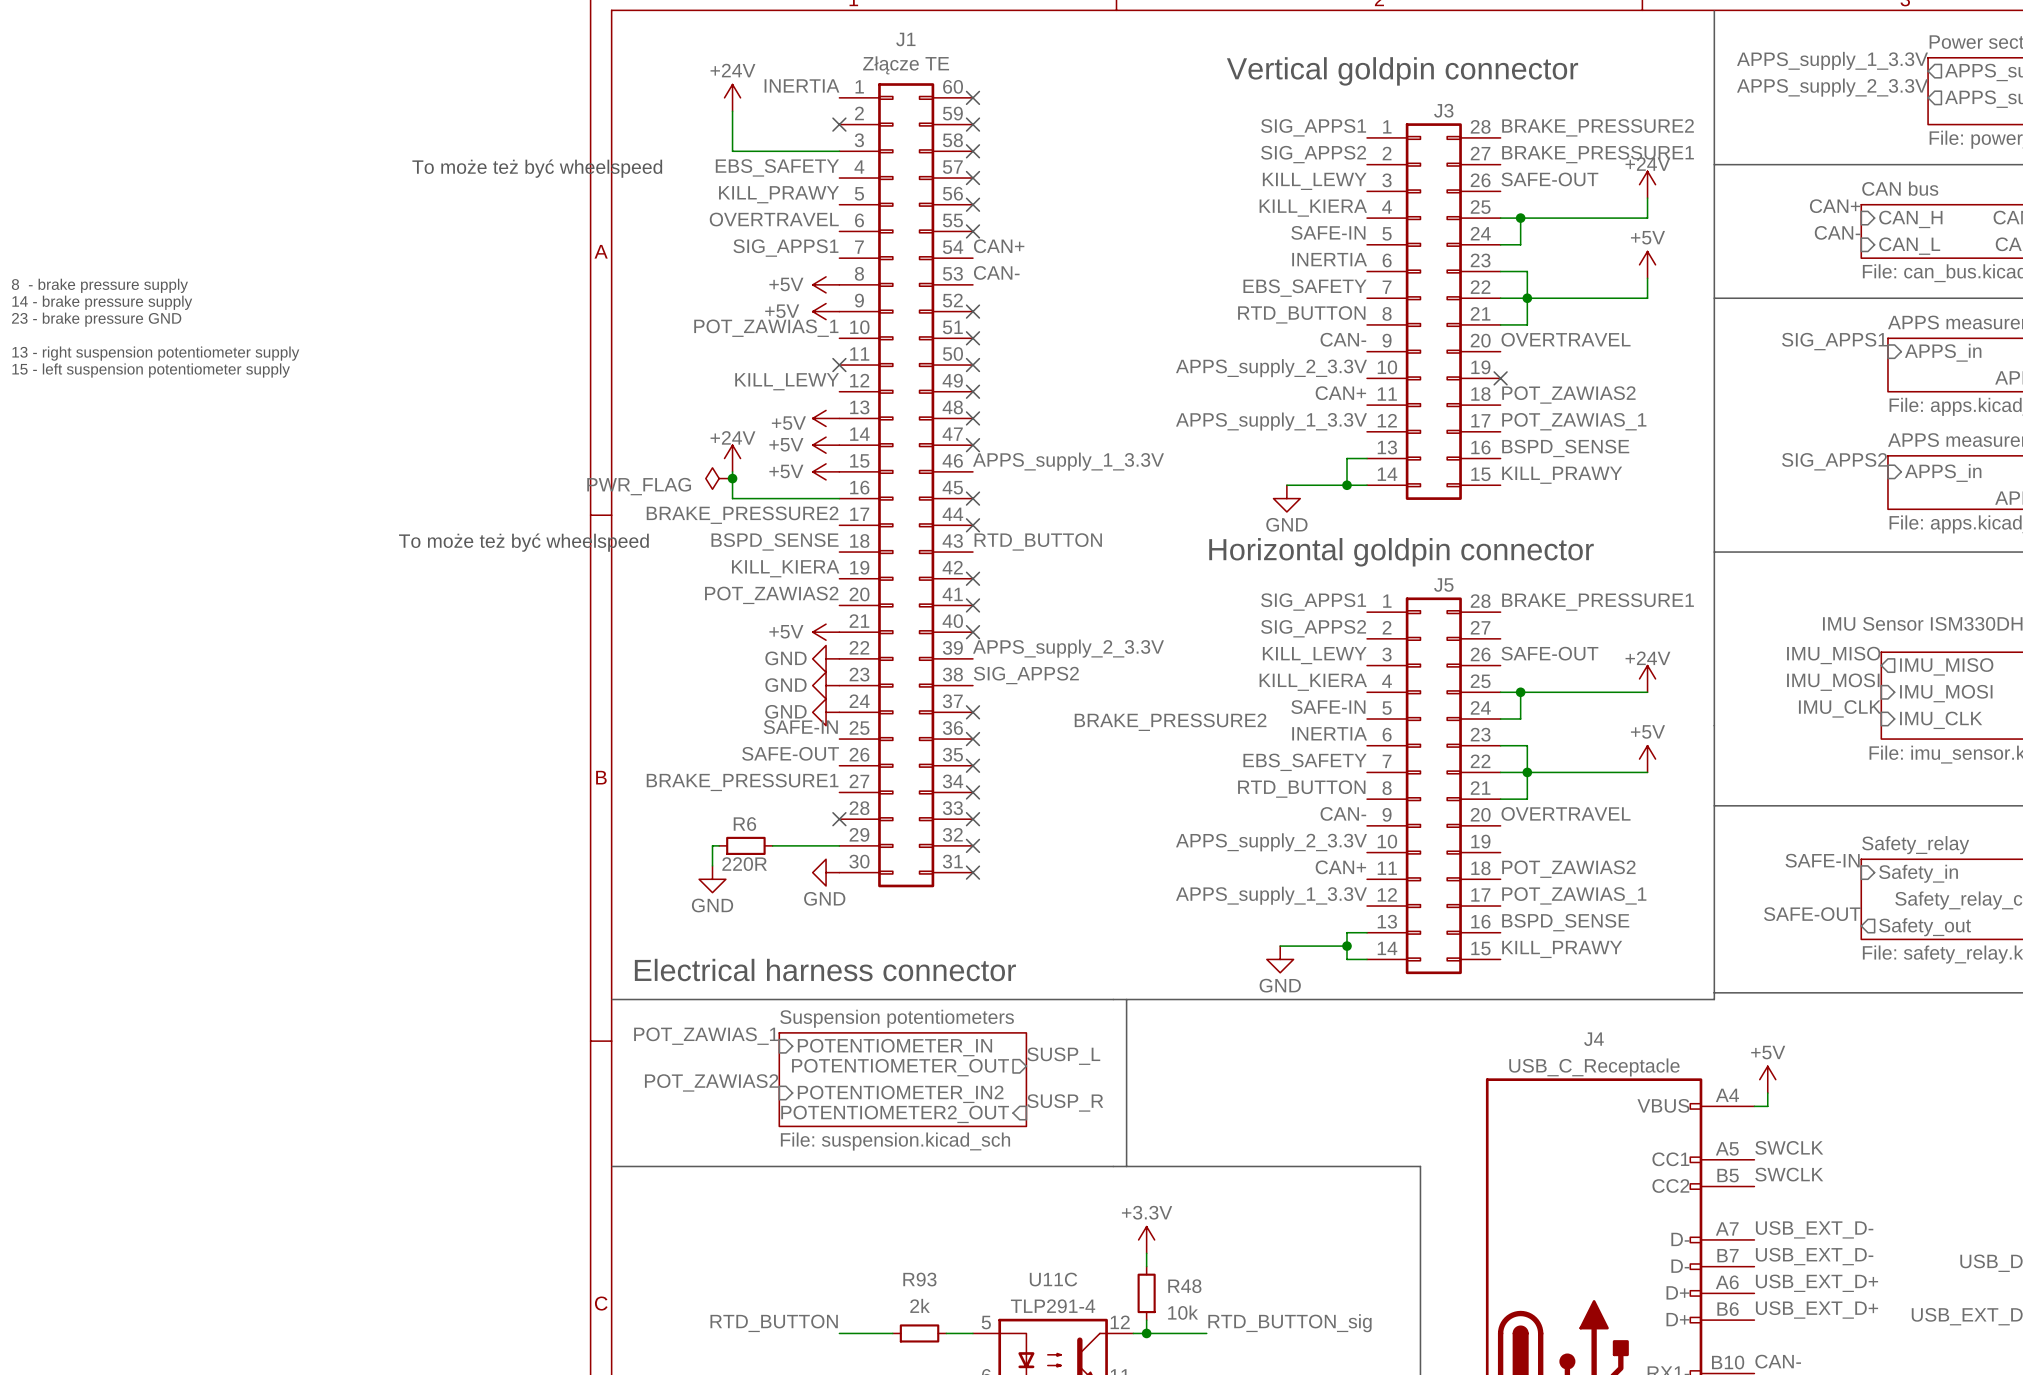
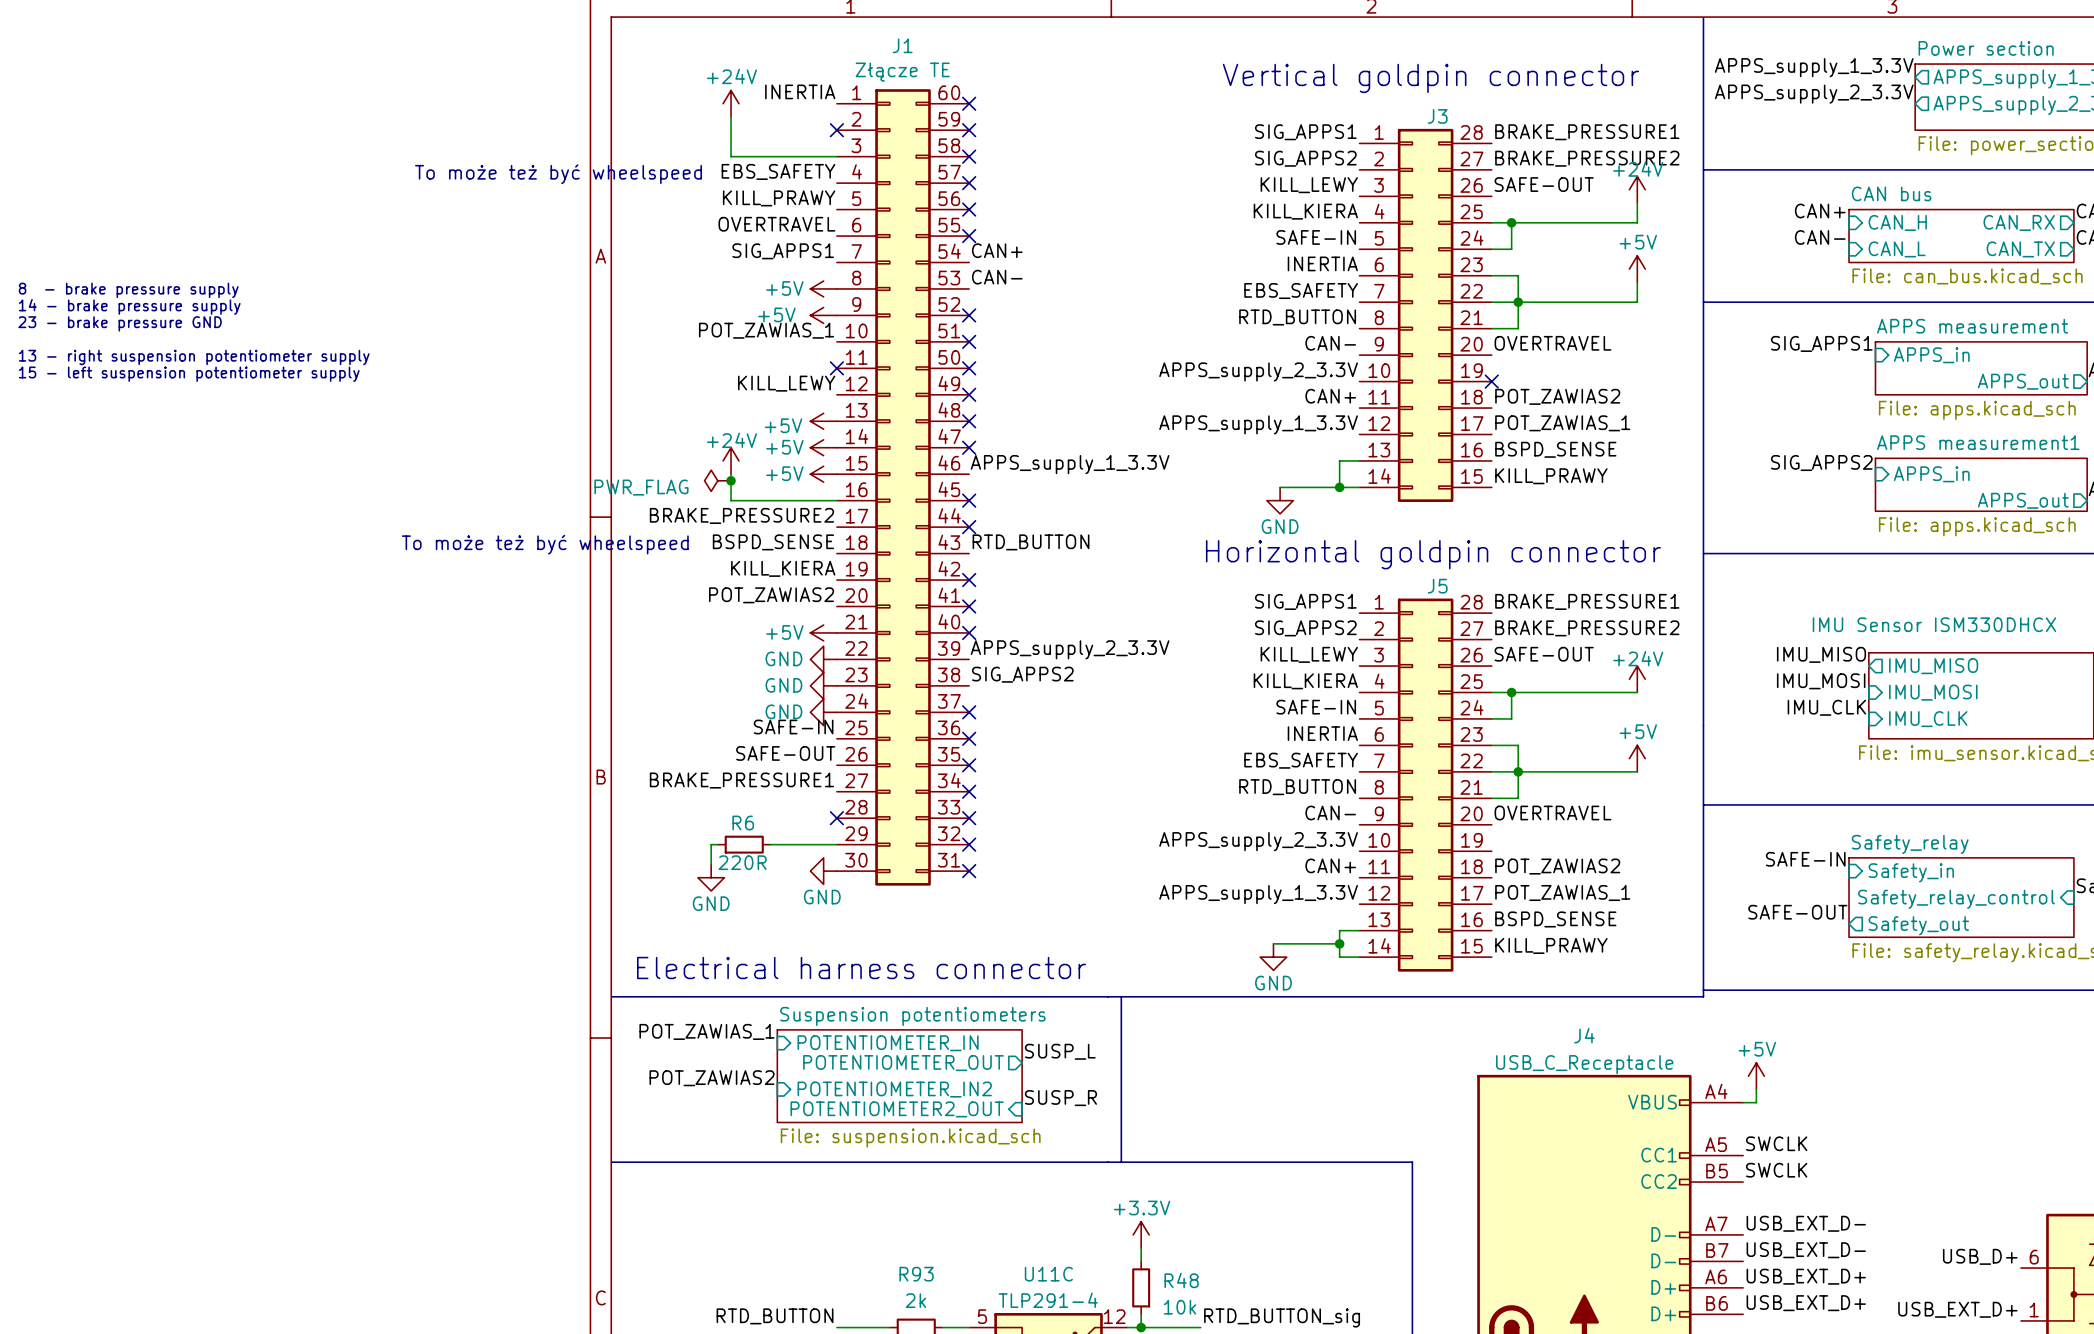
label: BRAKE_PRESSURE2 (1598, 127) -> BRAKE_PRESSURE1 (1587, 132)
label: BRAKE_PRESSURE1 (1598, 154) -> BRAKE_PRESSURE2 (1587, 158)
label: none -> BRAKE_PRESSURE2 (1587, 628)
label: BRAKE_PRESSURE2 (1170, 722) -> none

